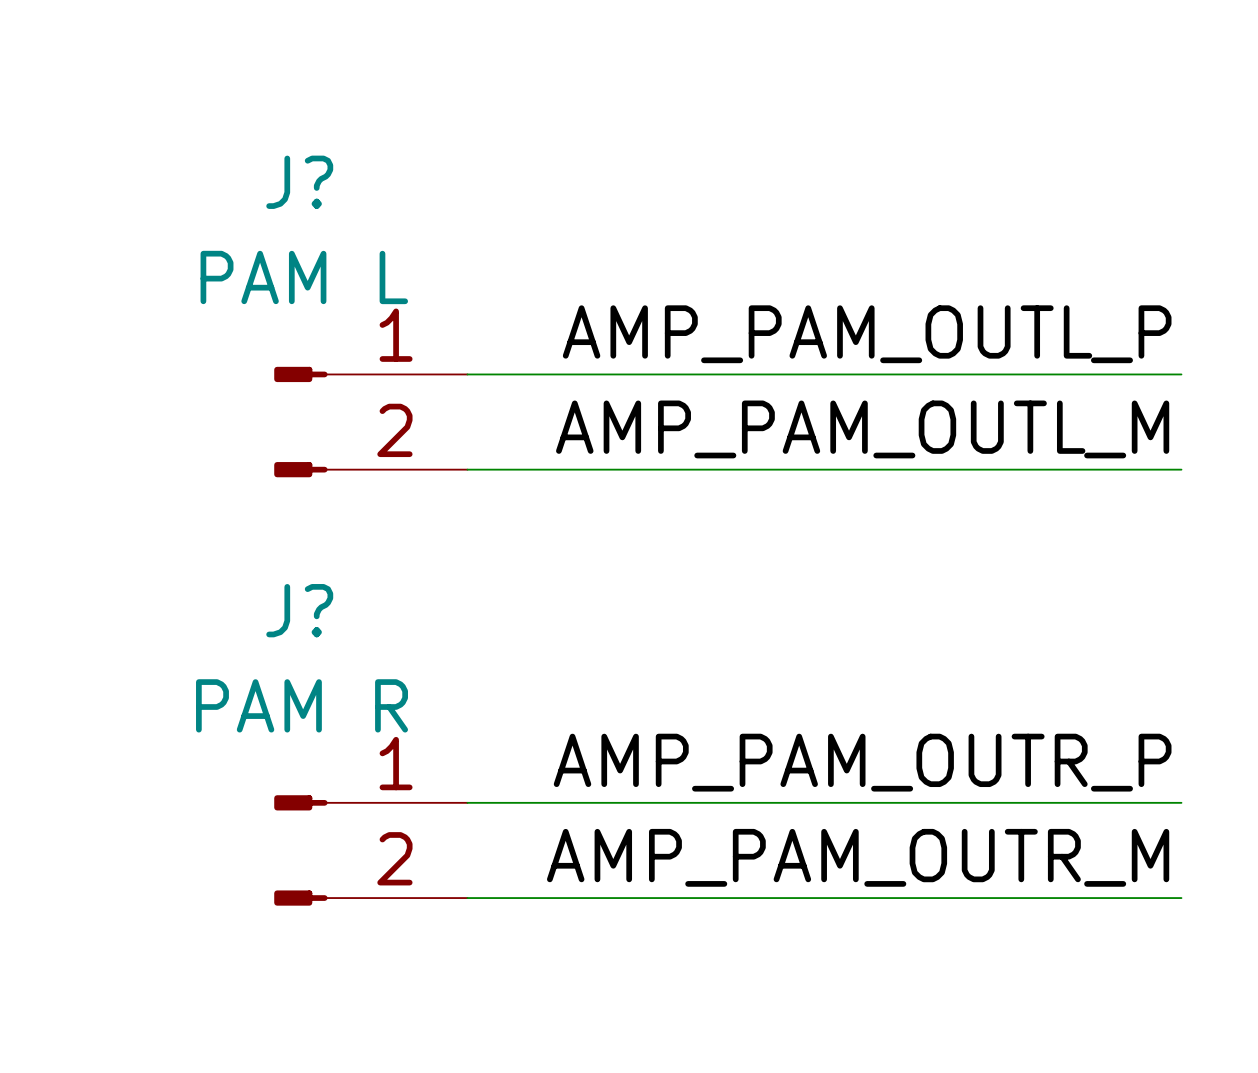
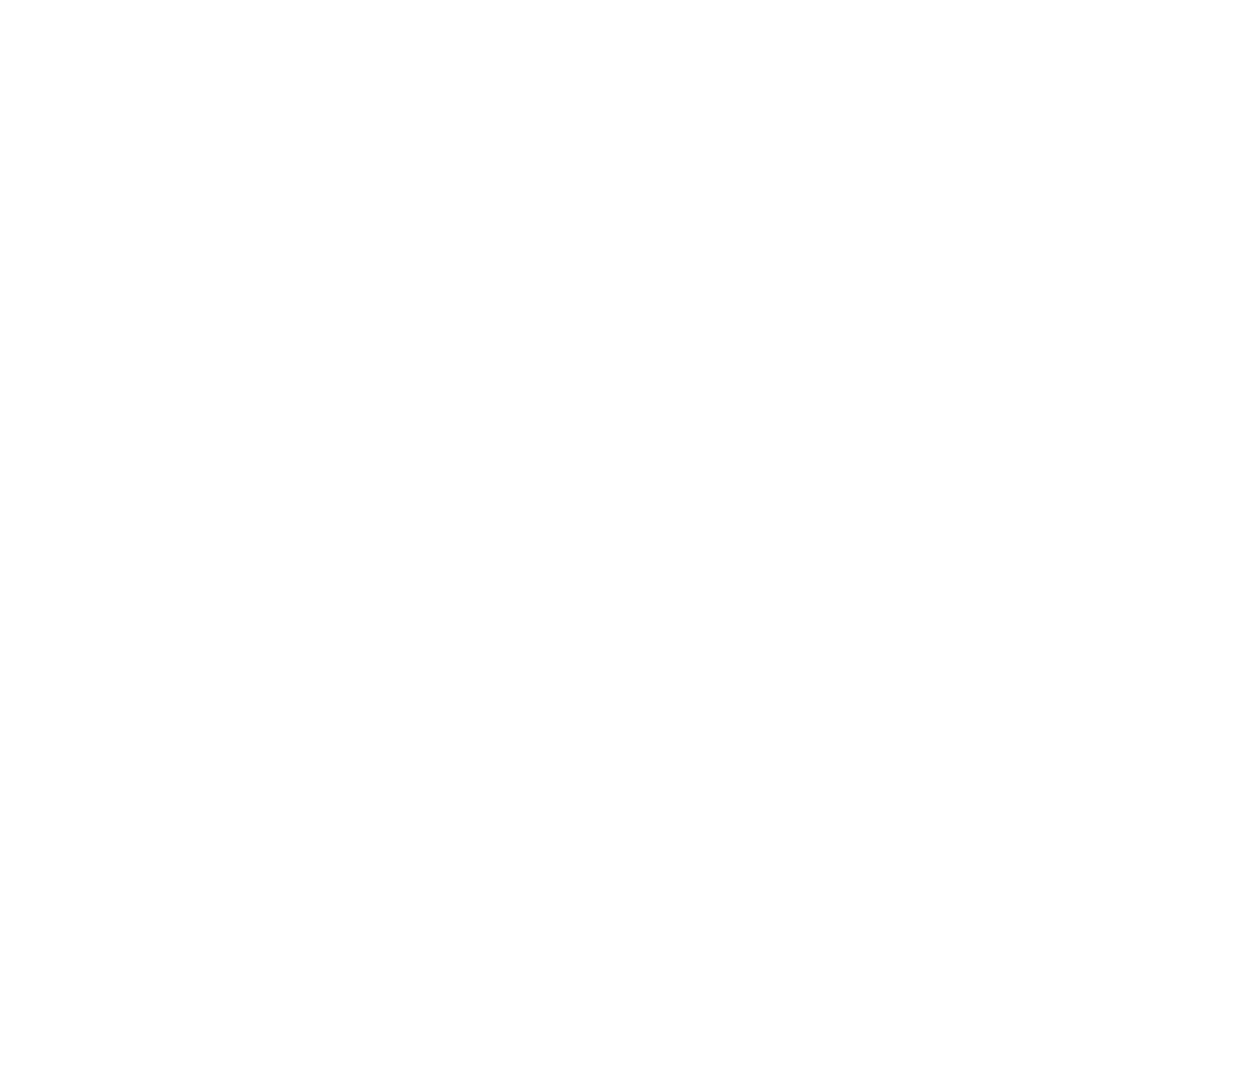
label: AMP_PAM_OUTL_P (867, 334) -> none
wire: (467, 374) (1181, 374) -> none
J?: PAM L (370, 422) -> none
label: AMP_PAM_OUTL_M (862, 429) -> none
wire: (467, 469) (1181, 469) -> none
label: AMP_PAM_OUTR_P (862, 762) -> none
wire: (467, 802) (1181, 802) -> none
J?: PAM R (370, 850) -> none
label: AMP_PAM_OUTR_M (858, 857) -> none
wire: (467, 898) (1181, 898) -> none

